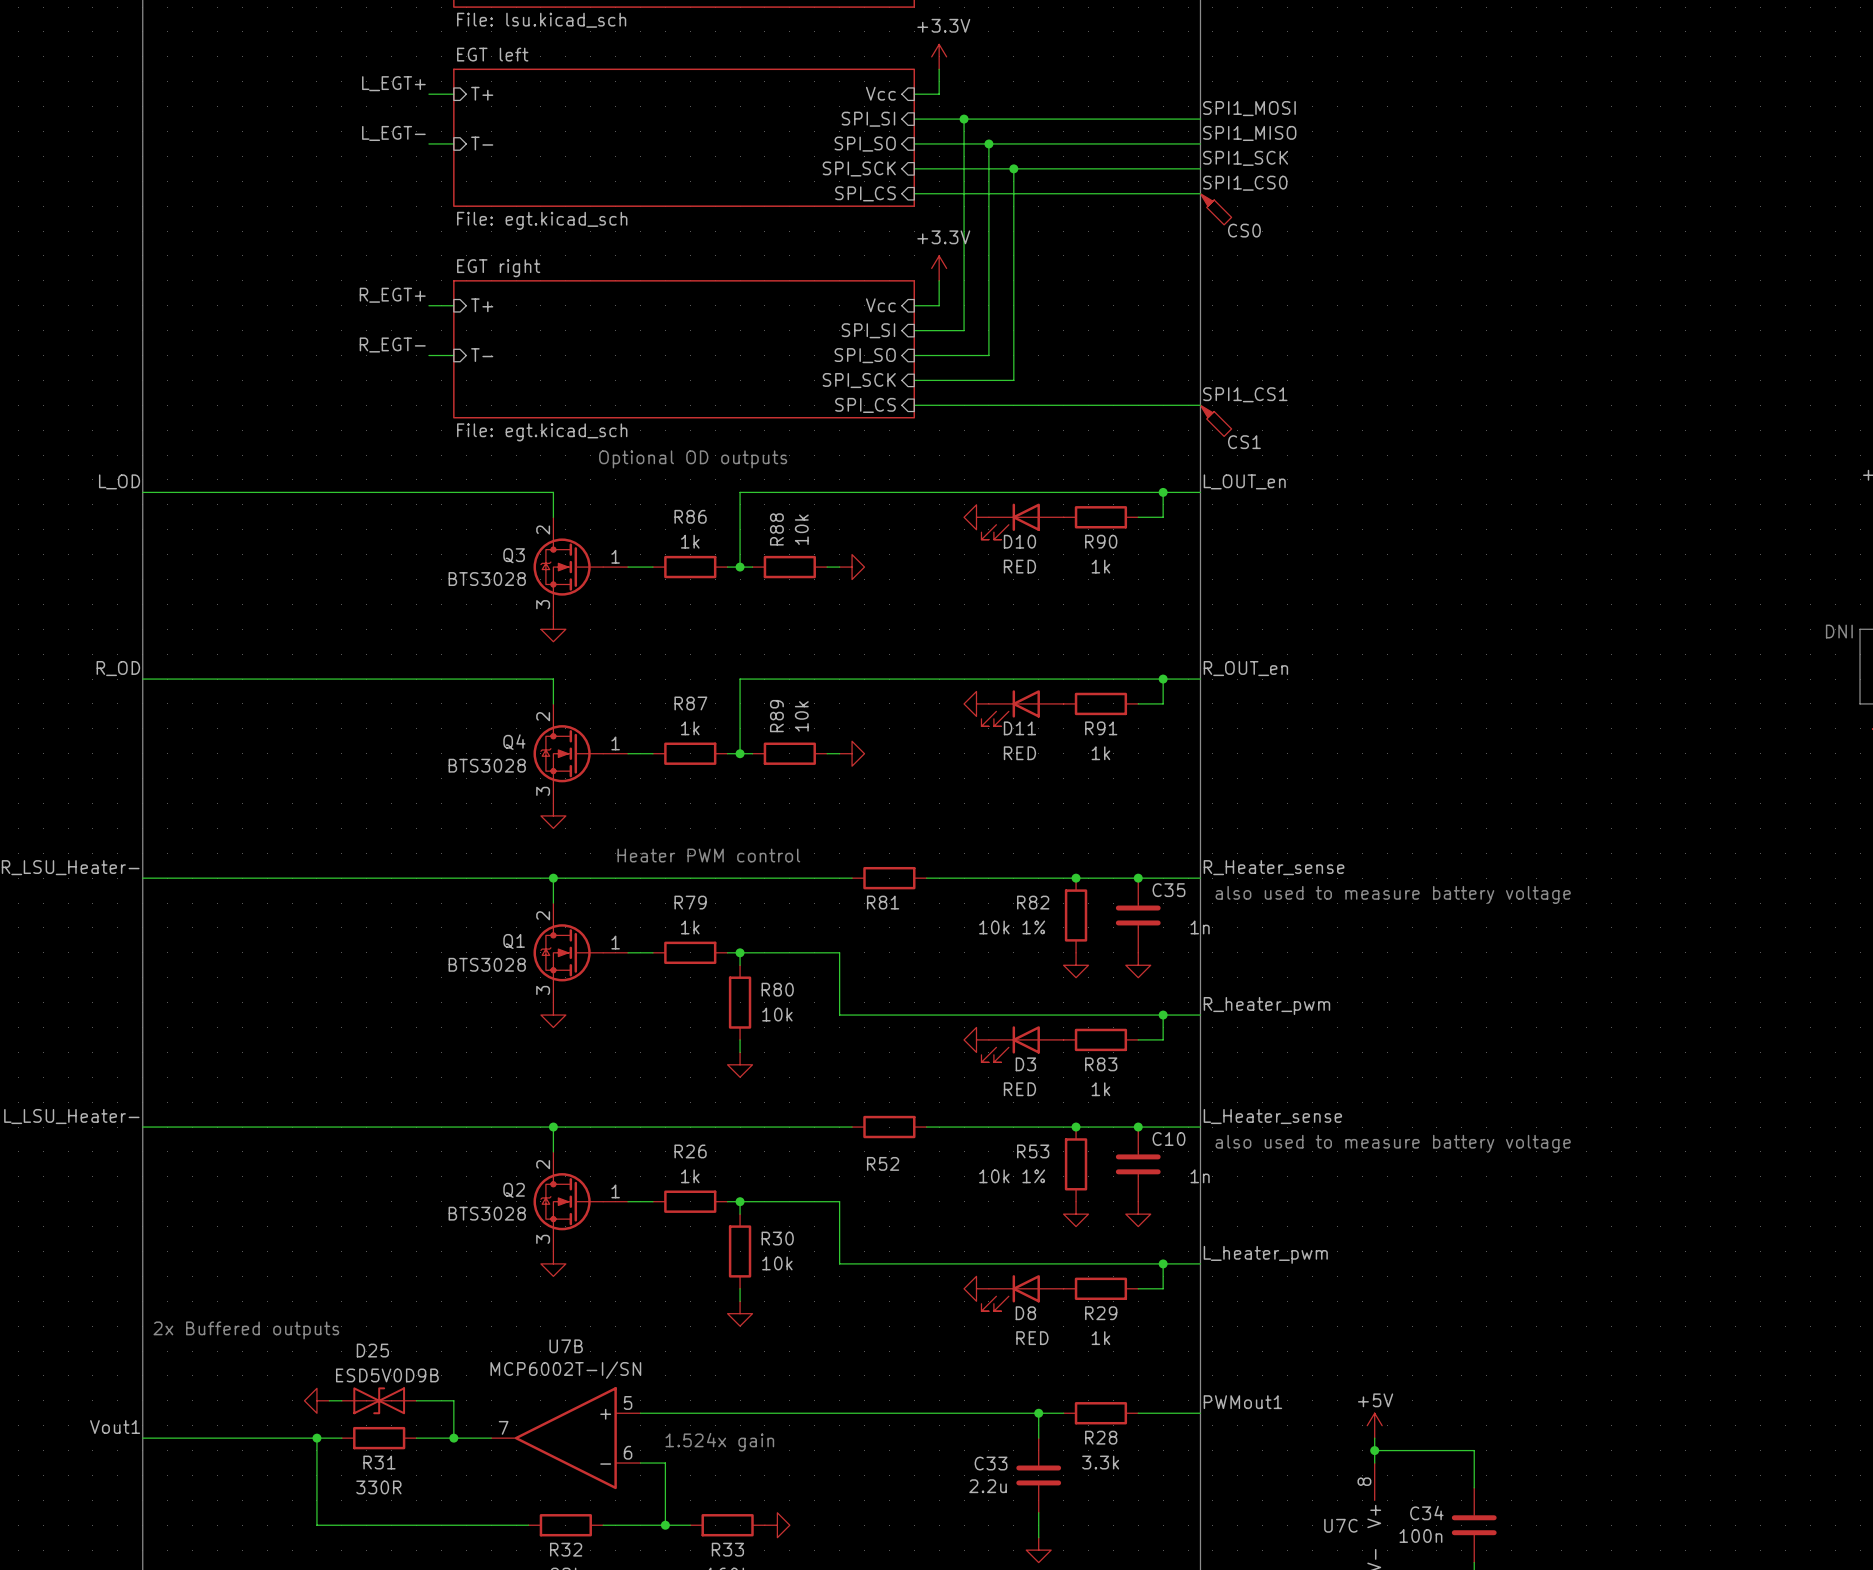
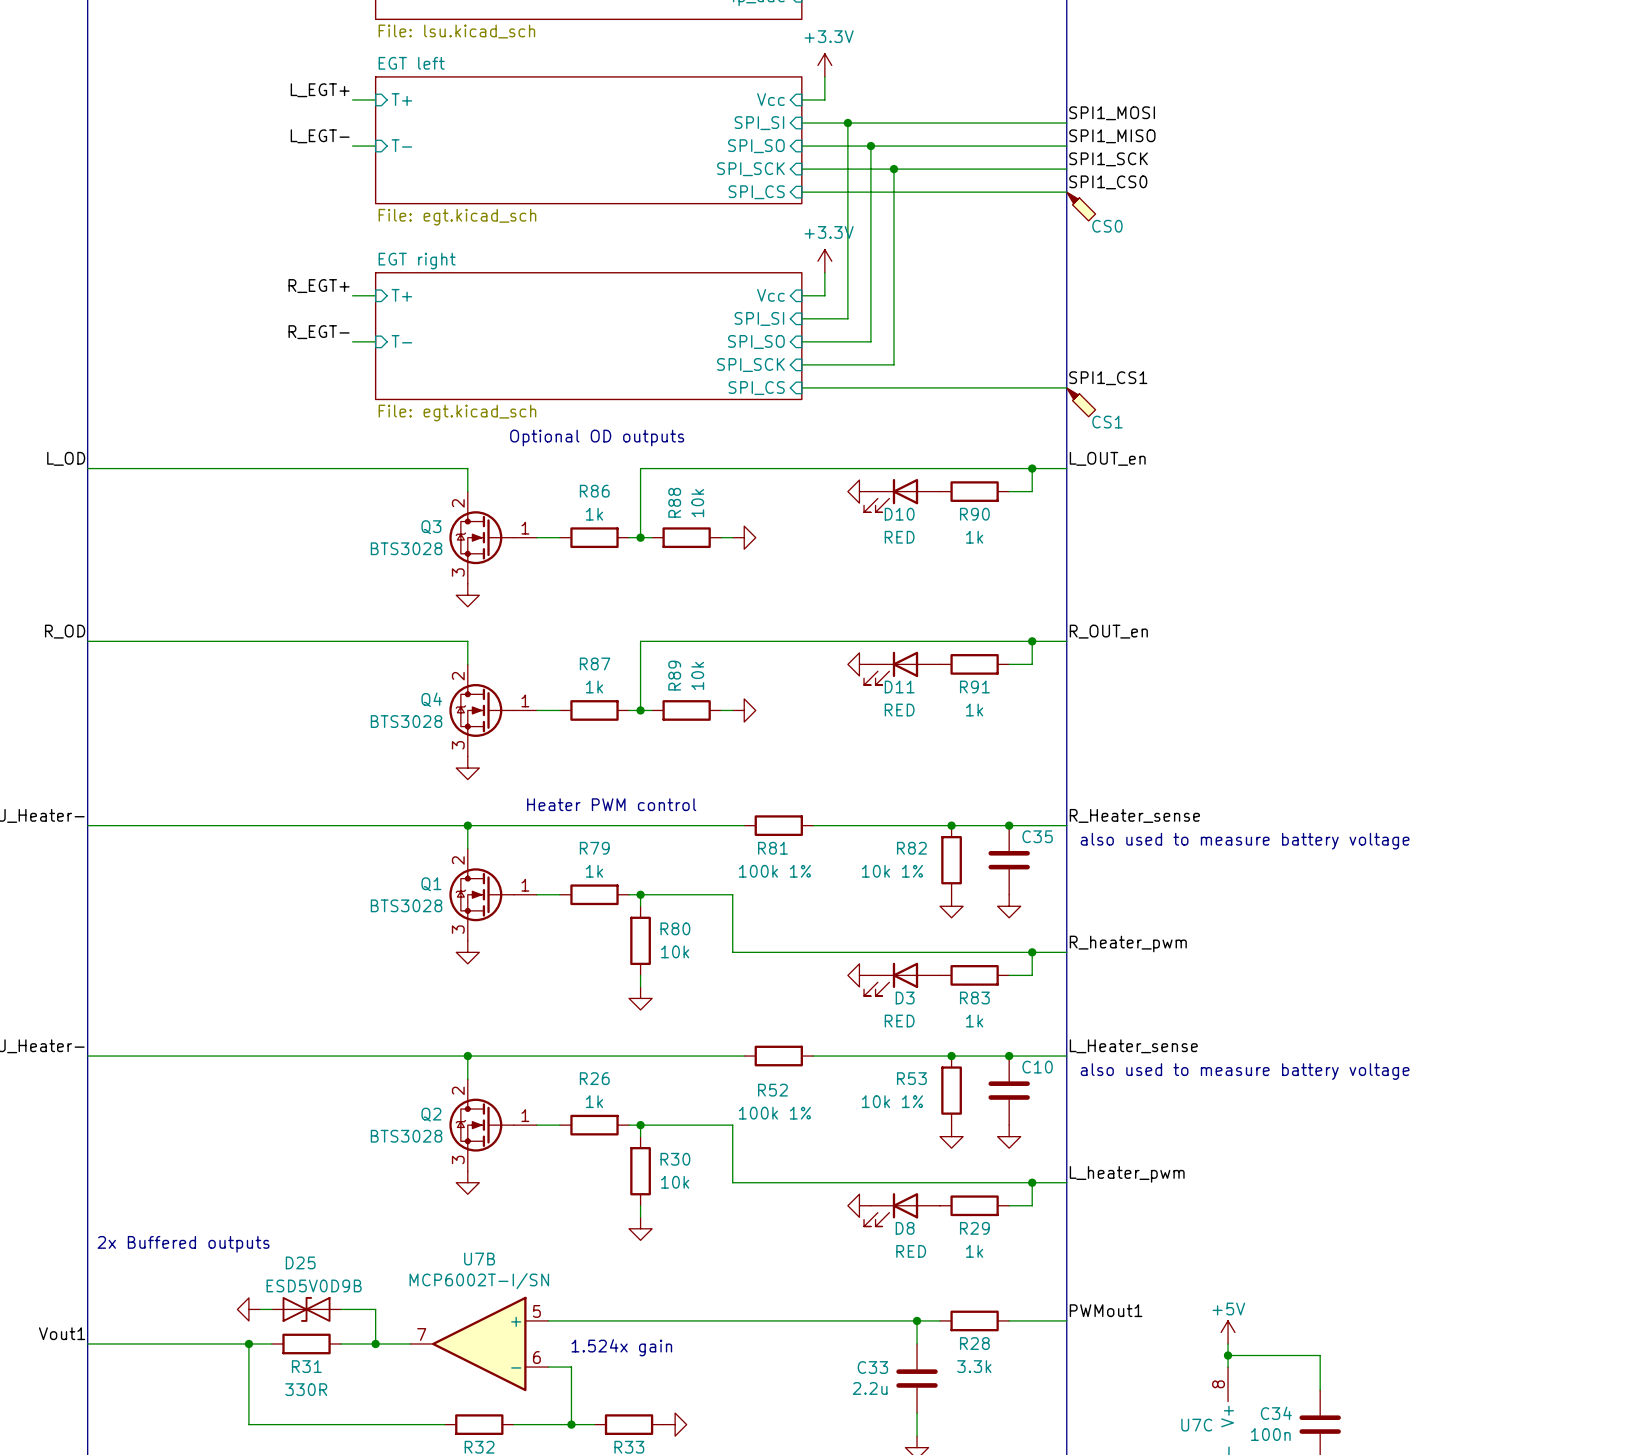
R81 value: none -> 100k 1% (774, 871)
C35 value: 1n (1200, 927) -> none
C10 value: 1n (1200, 1176) -> none
R52 value: none -> 100k 1% (774, 1113)

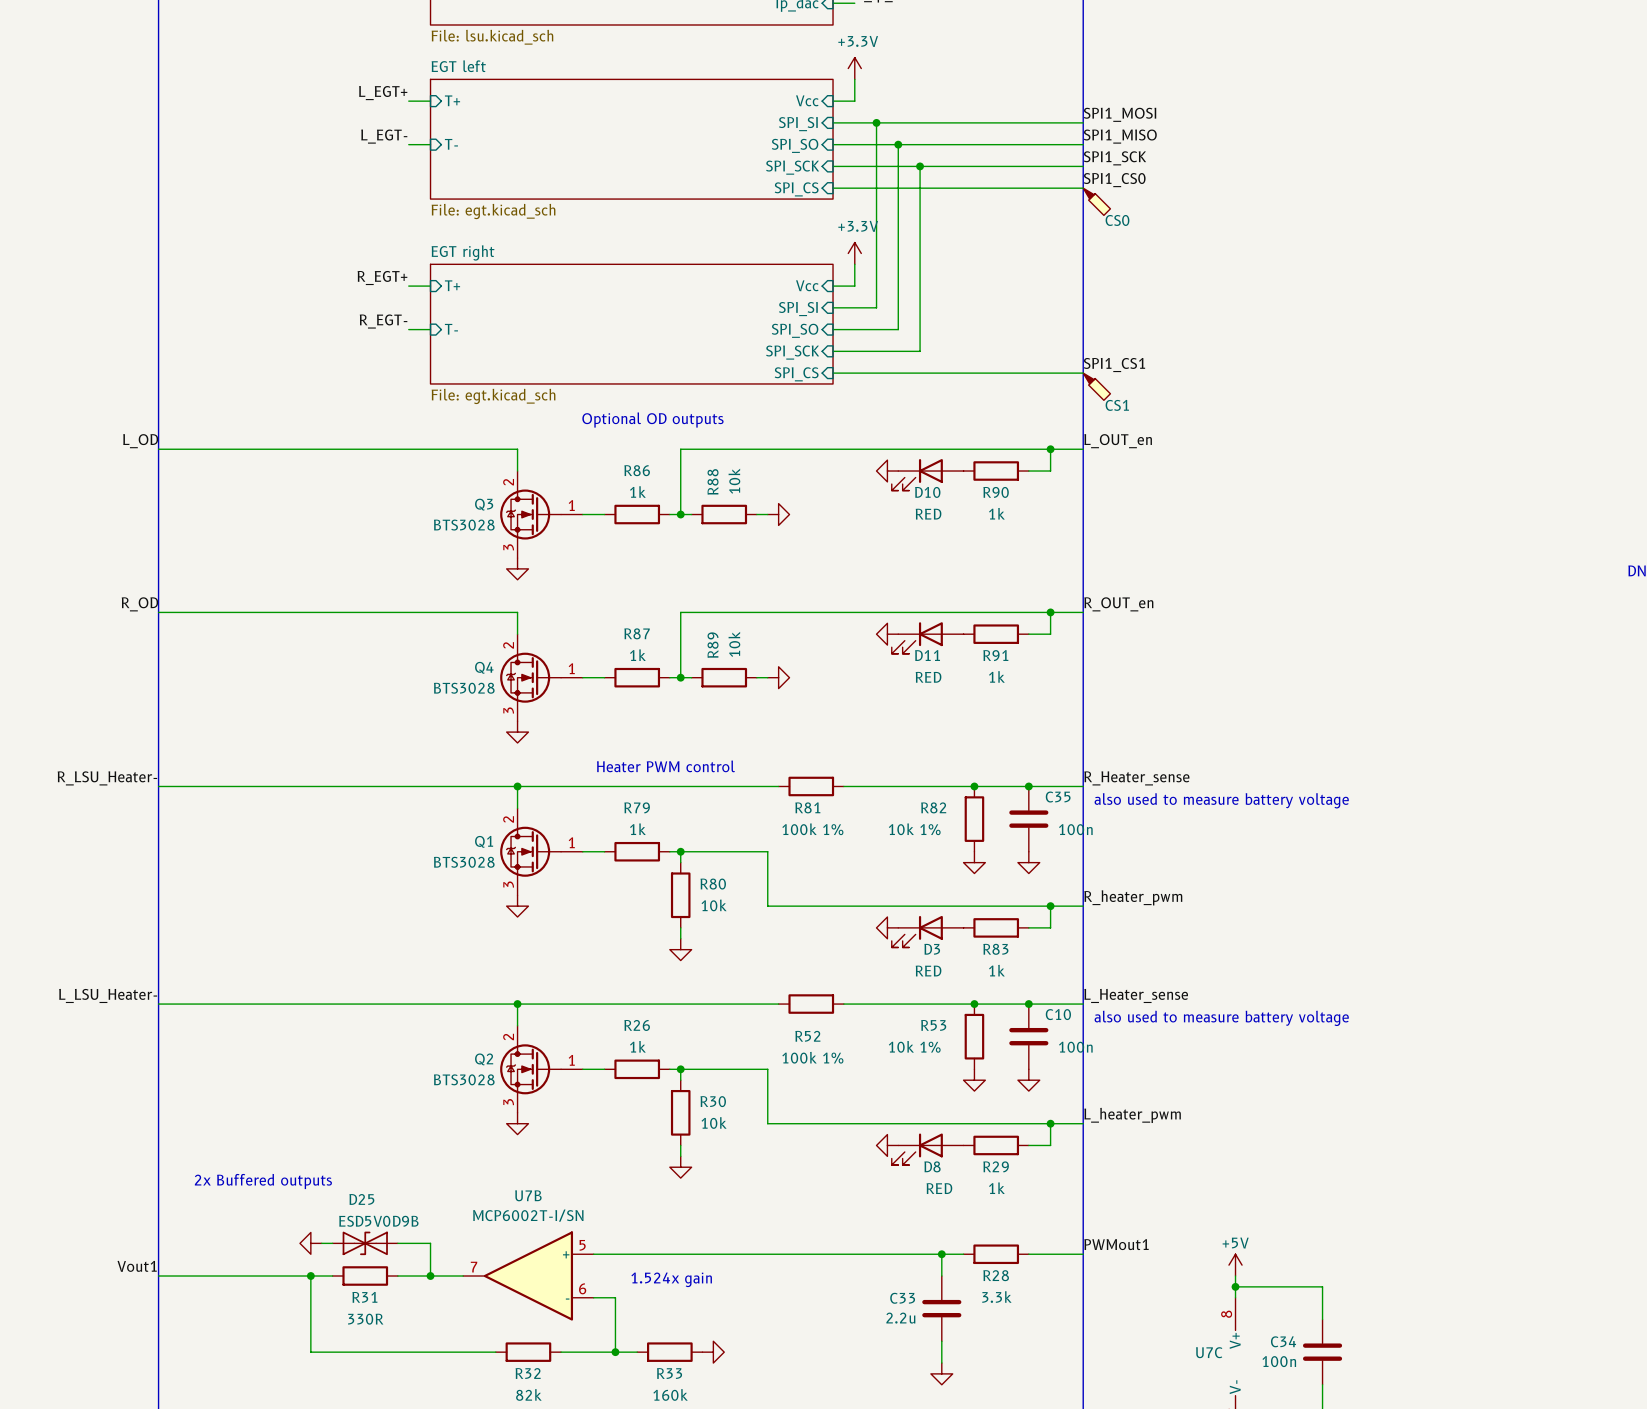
C35 value: none -> 100n (1075, 829)
C10 value: none -> 100n (1075, 1047)

